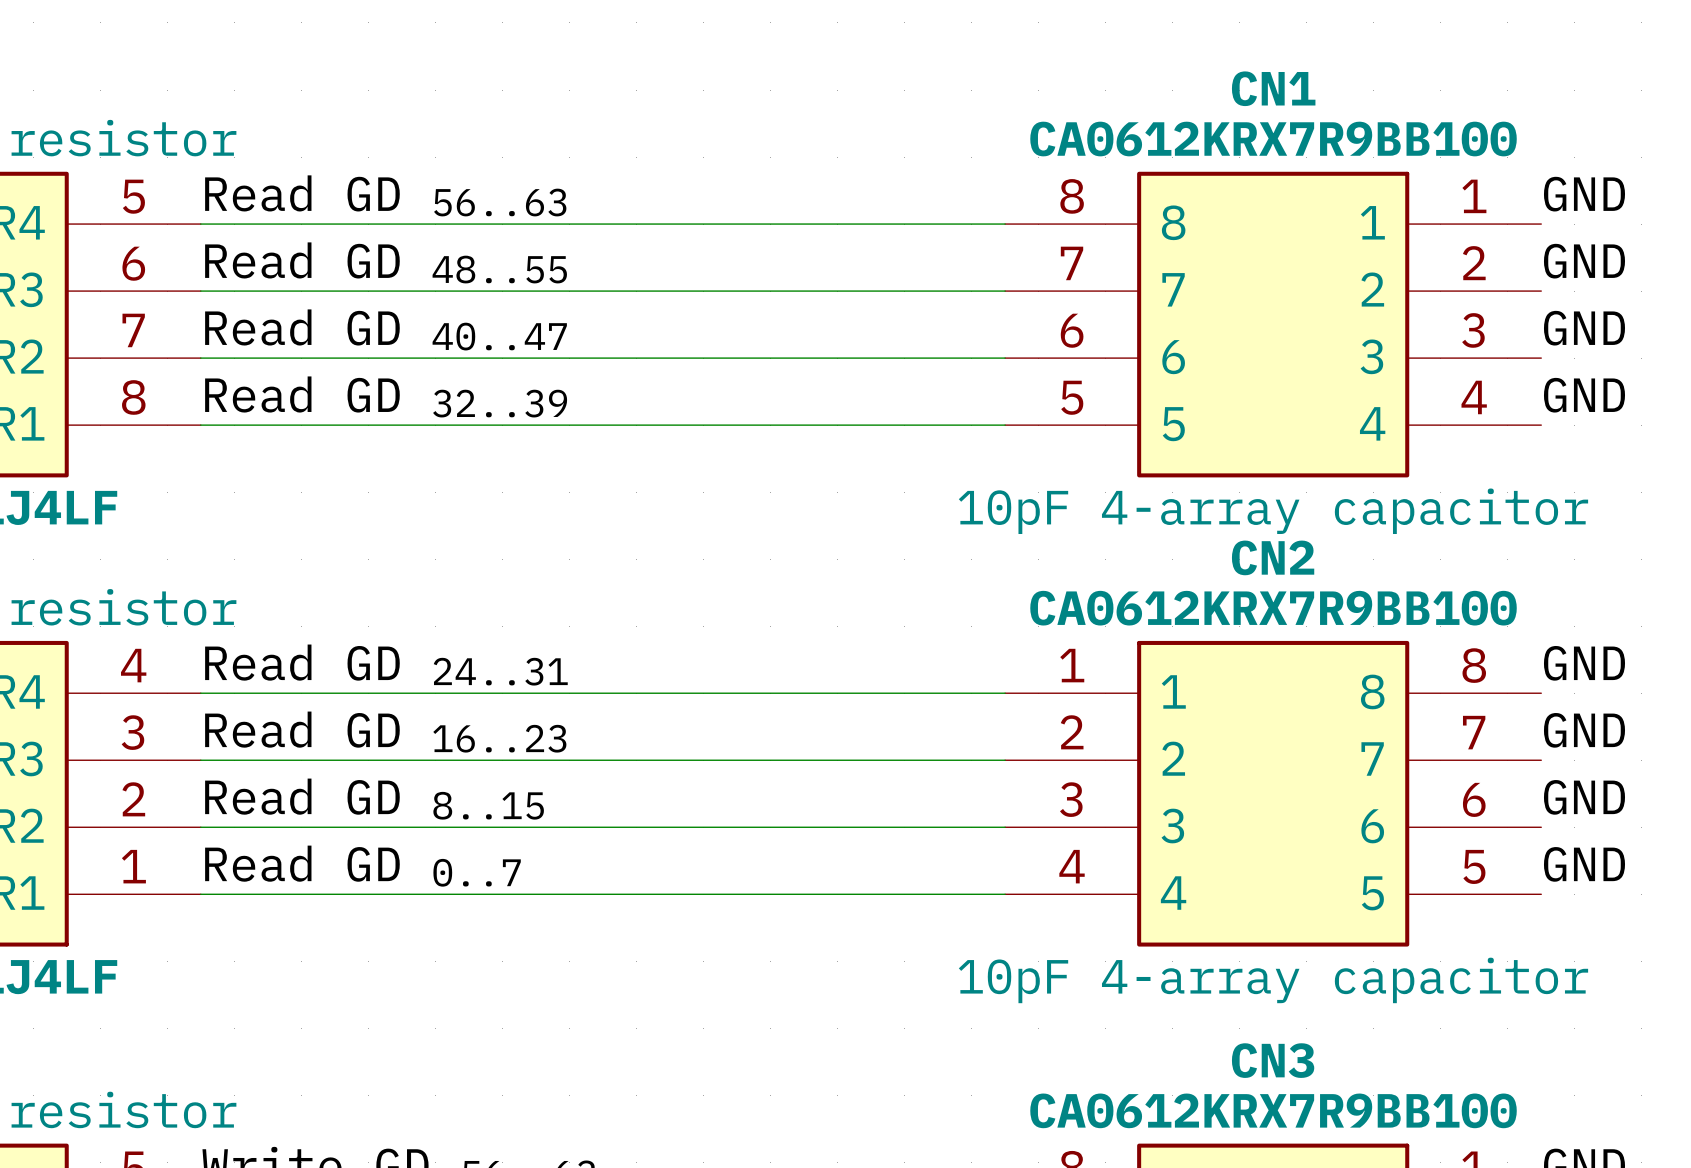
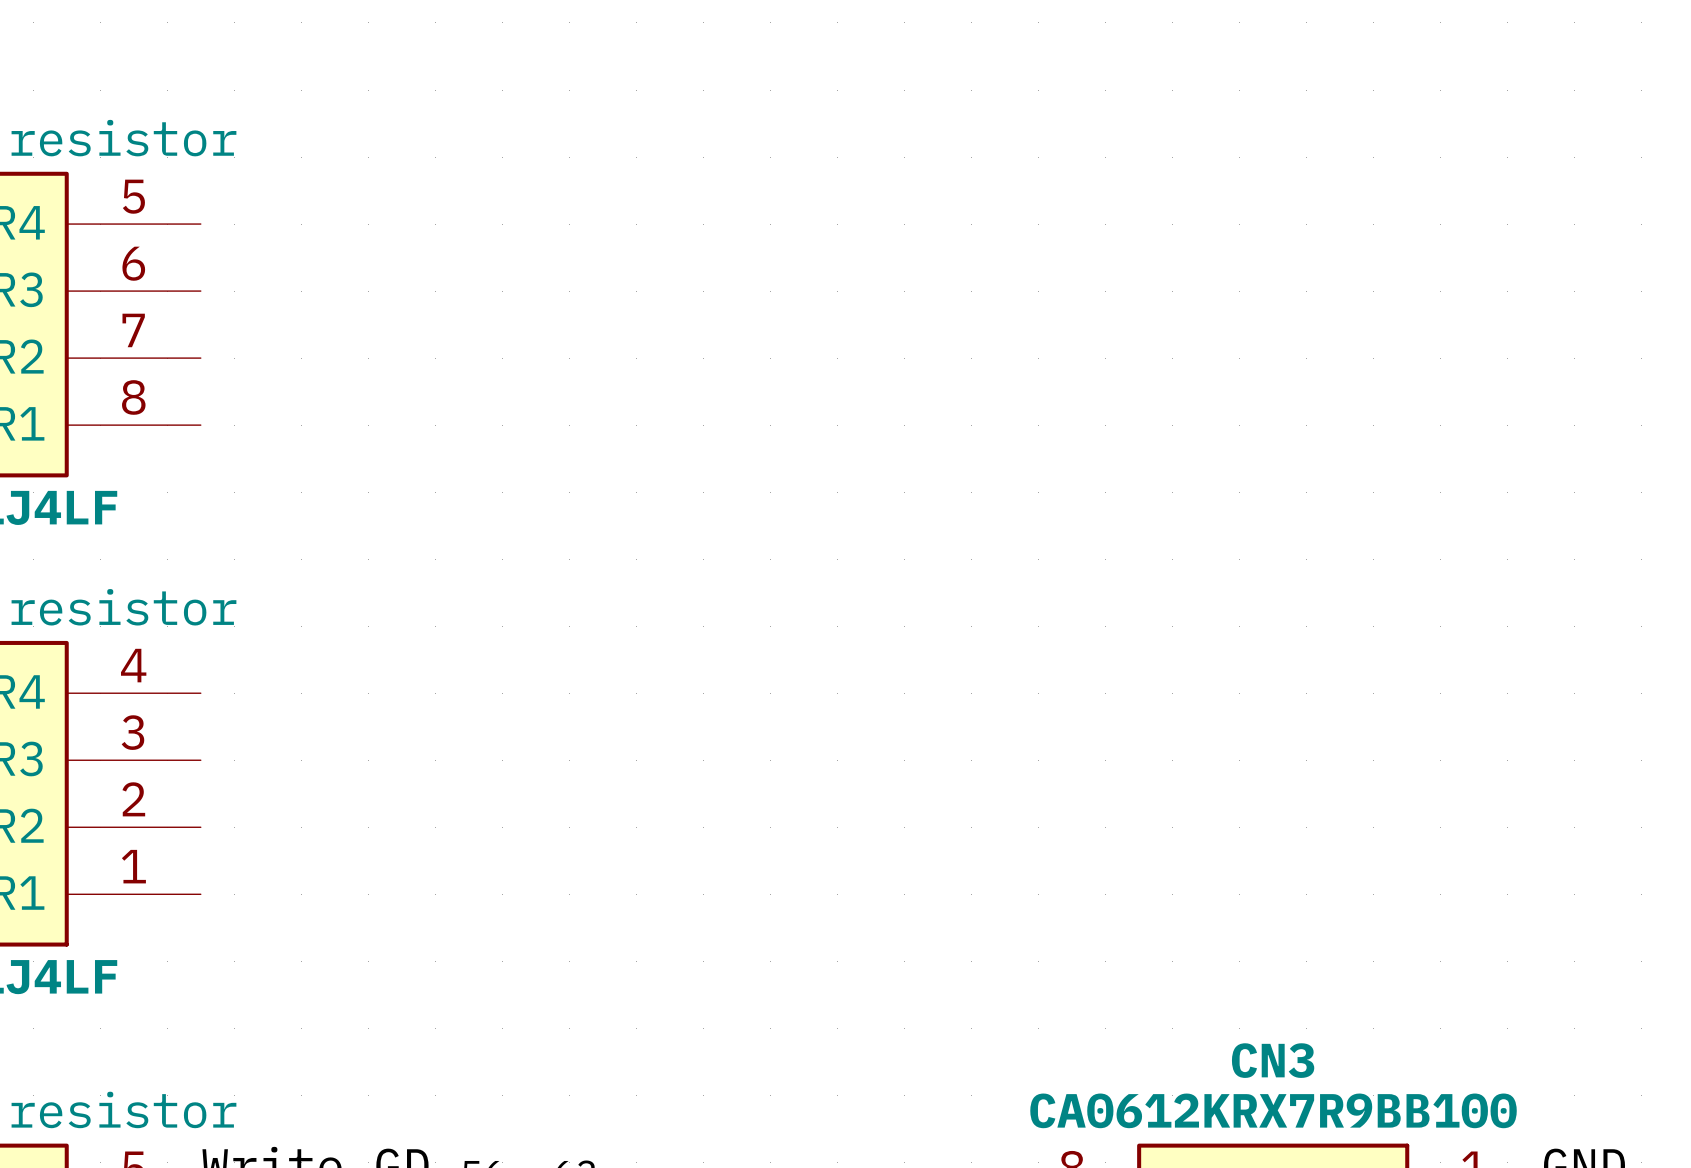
label: GND (1584, 194) -> none
label: Read GD 56..63 (385, 195) -> none
wire: (200, 224) (1005, 224) -> none
label: GND (1584, 261) -> none
label: Read GD 48..55 (386, 262) -> none
wire: (200, 291) (1005, 291) -> none
CN1: CA0612KRX7R9BB100 (1273, 324) -> none
label: GND (1584, 328) -> none
label: Read GD 40..47 (386, 329) -> none
wire: (200, 358) (1005, 358) -> none
label: GND (1584, 395) -> none
label: Read GD 32..39 (386, 396) -> none
wire: (200, 425) (1005, 425) -> none
label: GND (1584, 663) -> none
label: Read GD 24..31 (386, 665) -> none
wire: (200, 693) (1005, 693) -> none
label: GND (1584, 730) -> none
label: Read GD 16..23 (385, 732) -> none
wire: (200, 760) (1005, 760) -> none
CN2: CA0612KRX7R9BB100 (1273, 793) -> none
label: GND (1584, 797) -> none
label: Read GD 8..15 (374, 799) -> none
wire: (200, 827) (1005, 827) -> none
label: GND (1584, 864) -> none
label: Read GD 0..7 (362, 866) -> none
wire: (200, 894) (1005, 894) -> none

